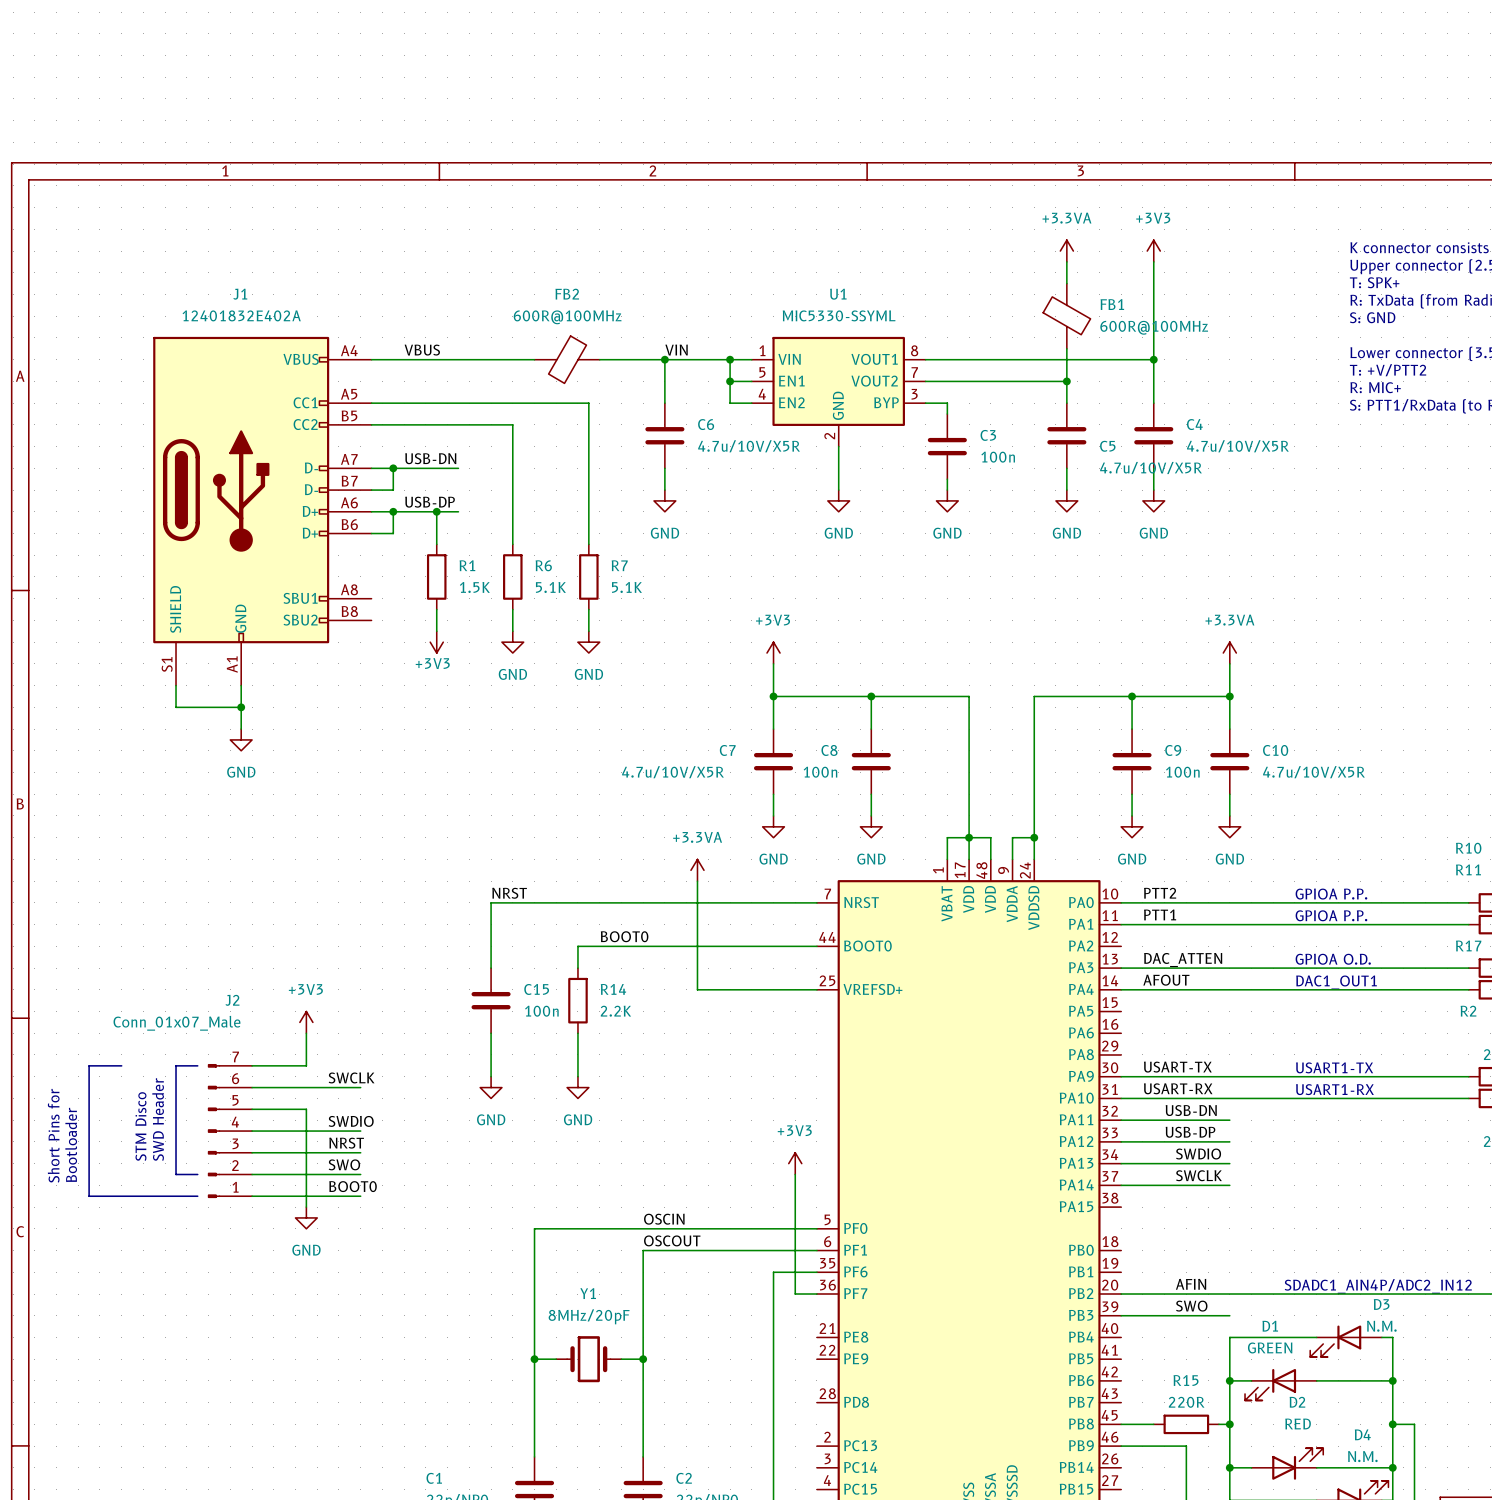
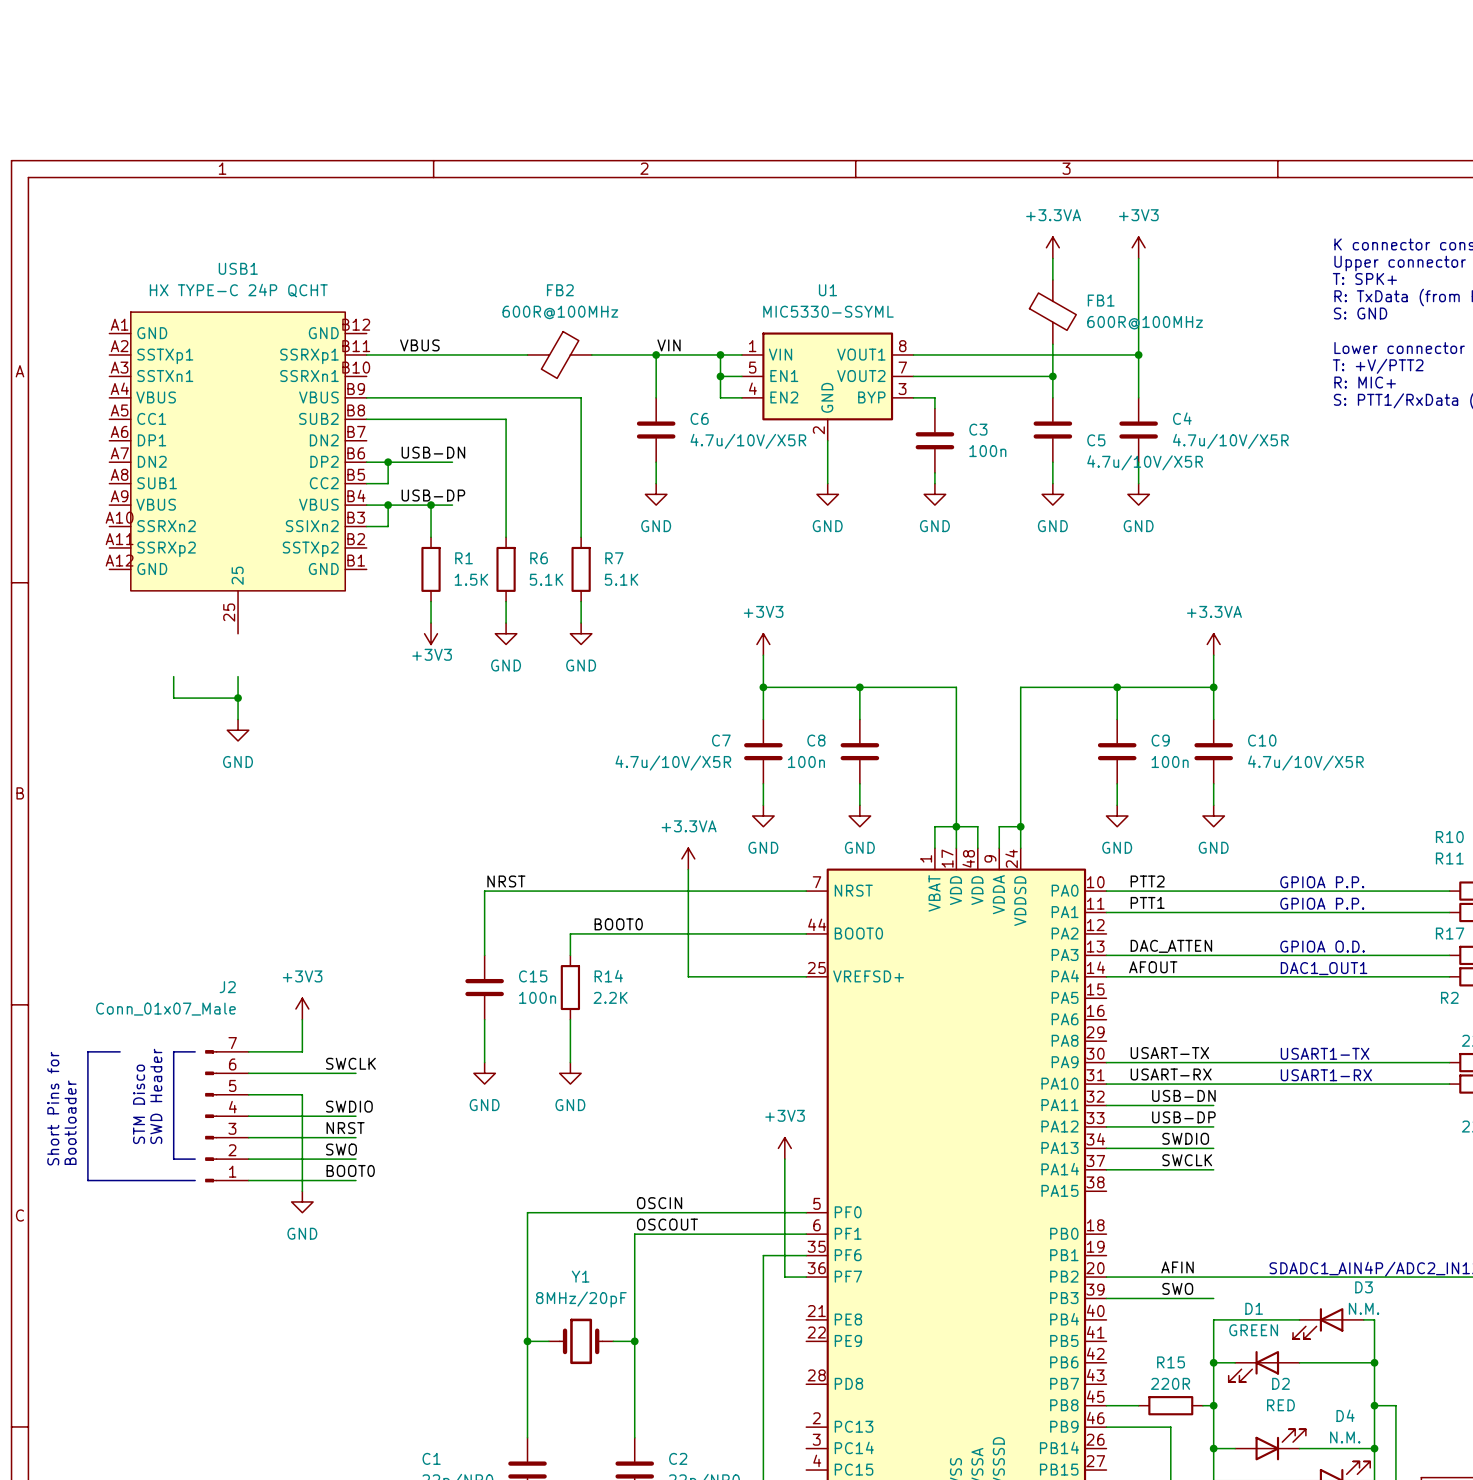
USB1: none -> HX TYPE-C 24P QCHT (238, 472)
J1: 12401832E402A (262, 511) -> none

